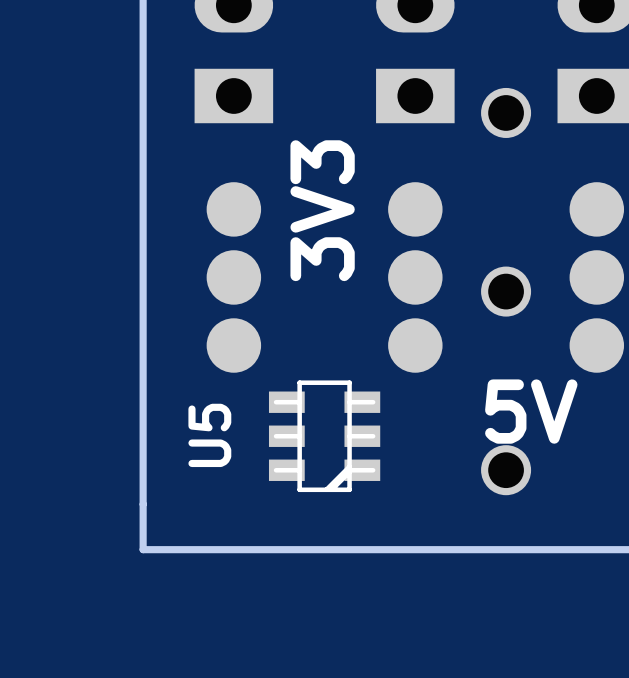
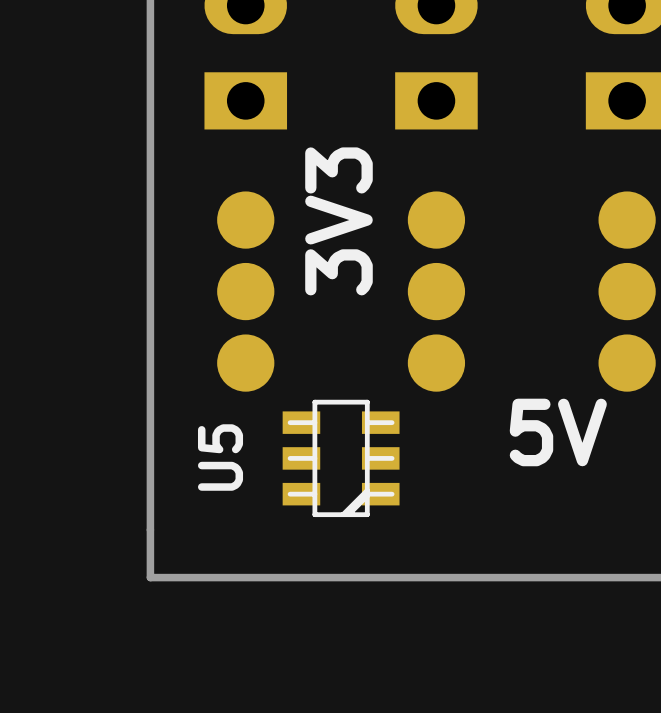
part: (506, 112) -> none
part: (506, 291) -> none
part: (506, 470) -> none

